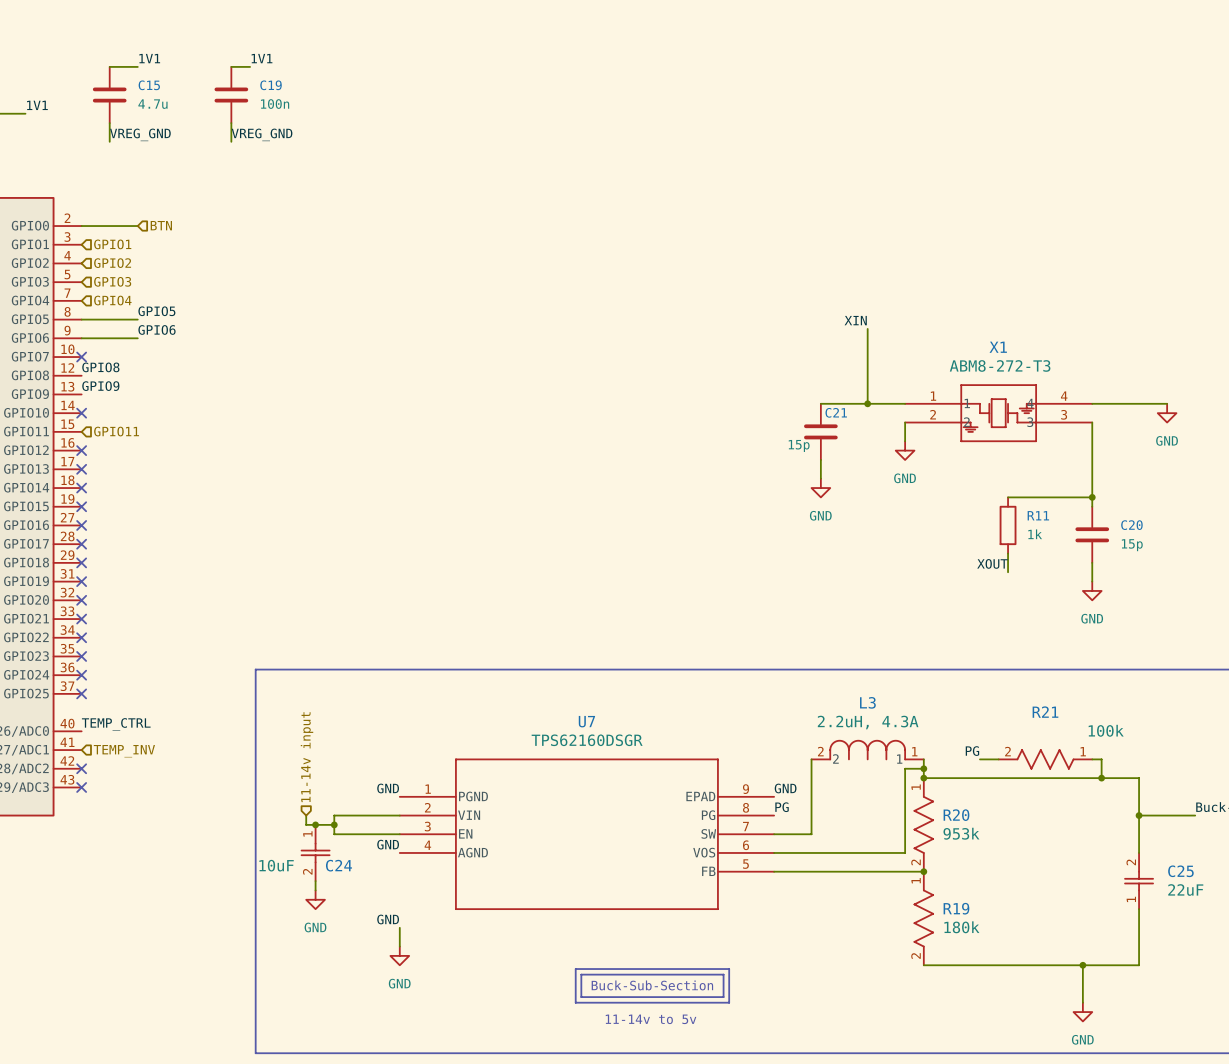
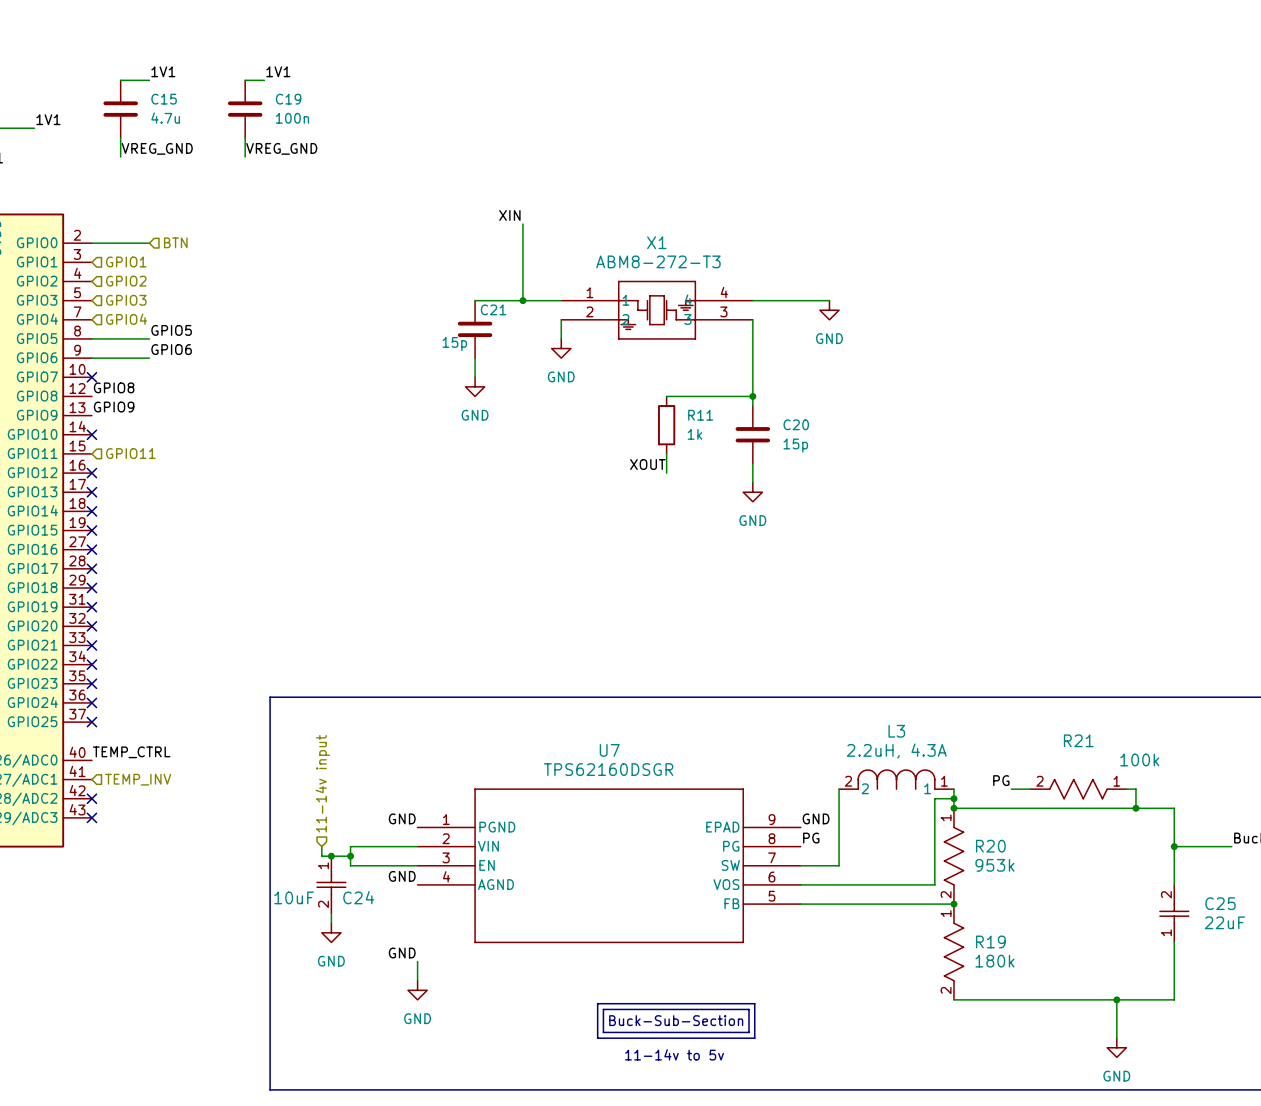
label: none -> XIN (509, 215)
wire: none -> (522, 224) (522, 300)
wire: none -> (475, 300) (561, 300)
junction: none -> (522, 300)
wire: none -> (752, 300) (829, 300)
power symbol: none -> GND (829, 310)
wire: none -> (561, 319) (561, 338)
wire: none -> (752, 319) (752, 406)
label: XIN (855, 320) -> none
power symbol: none -> GND (561, 348)
wire: (867, 328) (867, 403) -> none
wire: none -> (475, 358) (475, 377)
power symbol: none -> GND (475, 386)
junction: none -> (752, 396)
wire: (820, 403) (905, 403) -> (666, 396) (752, 396)
junction: (867, 403) -> none
wire: (1092, 403) (1167, 403) -> none
X1 position: (998, 413) -> (657, 310)
power symbol: GND (1167, 413) -> none
wire: (905, 422) (905, 441) -> (752, 463) (752, 482)
wire: (1092, 422) (1092, 506) -> none
C21 position: (820, 431) -> (475, 329)
label: none -> XOUT (647, 464)
power symbol: GND (905, 450) -> none
wire: (820, 459) (820, 478) -> (666, 453) (666, 473)
power symbol: none -> GND (752, 492)
power symbol: GND (820, 488) -> none
wire: (1008, 497) (1092, 497) -> none
junction: (1092, 497) -> none
R11 position: (1008, 525) -> (666, 425)
C20 position: (1092, 534) -> (752, 434)
wire: (1008, 553) (1008, 572) -> none
wire: (1092, 562) (1092, 581) -> none
label: XOUT (992, 563) -> none
power symbol: GND (1092, 590) -> none

